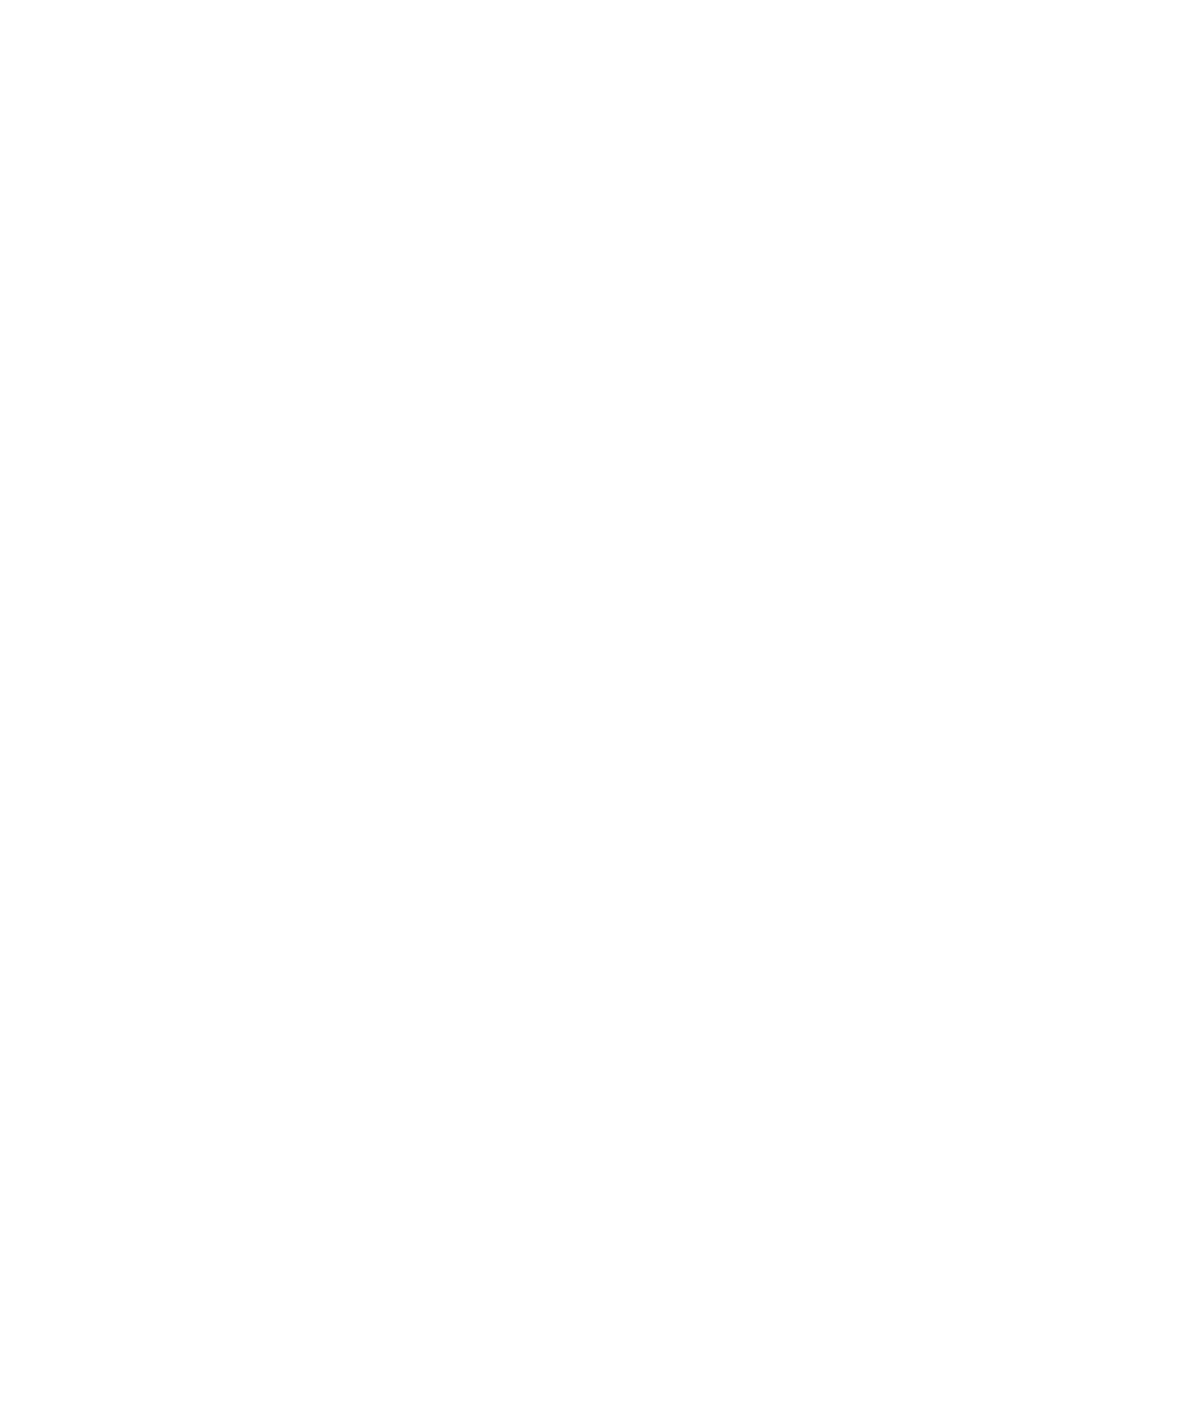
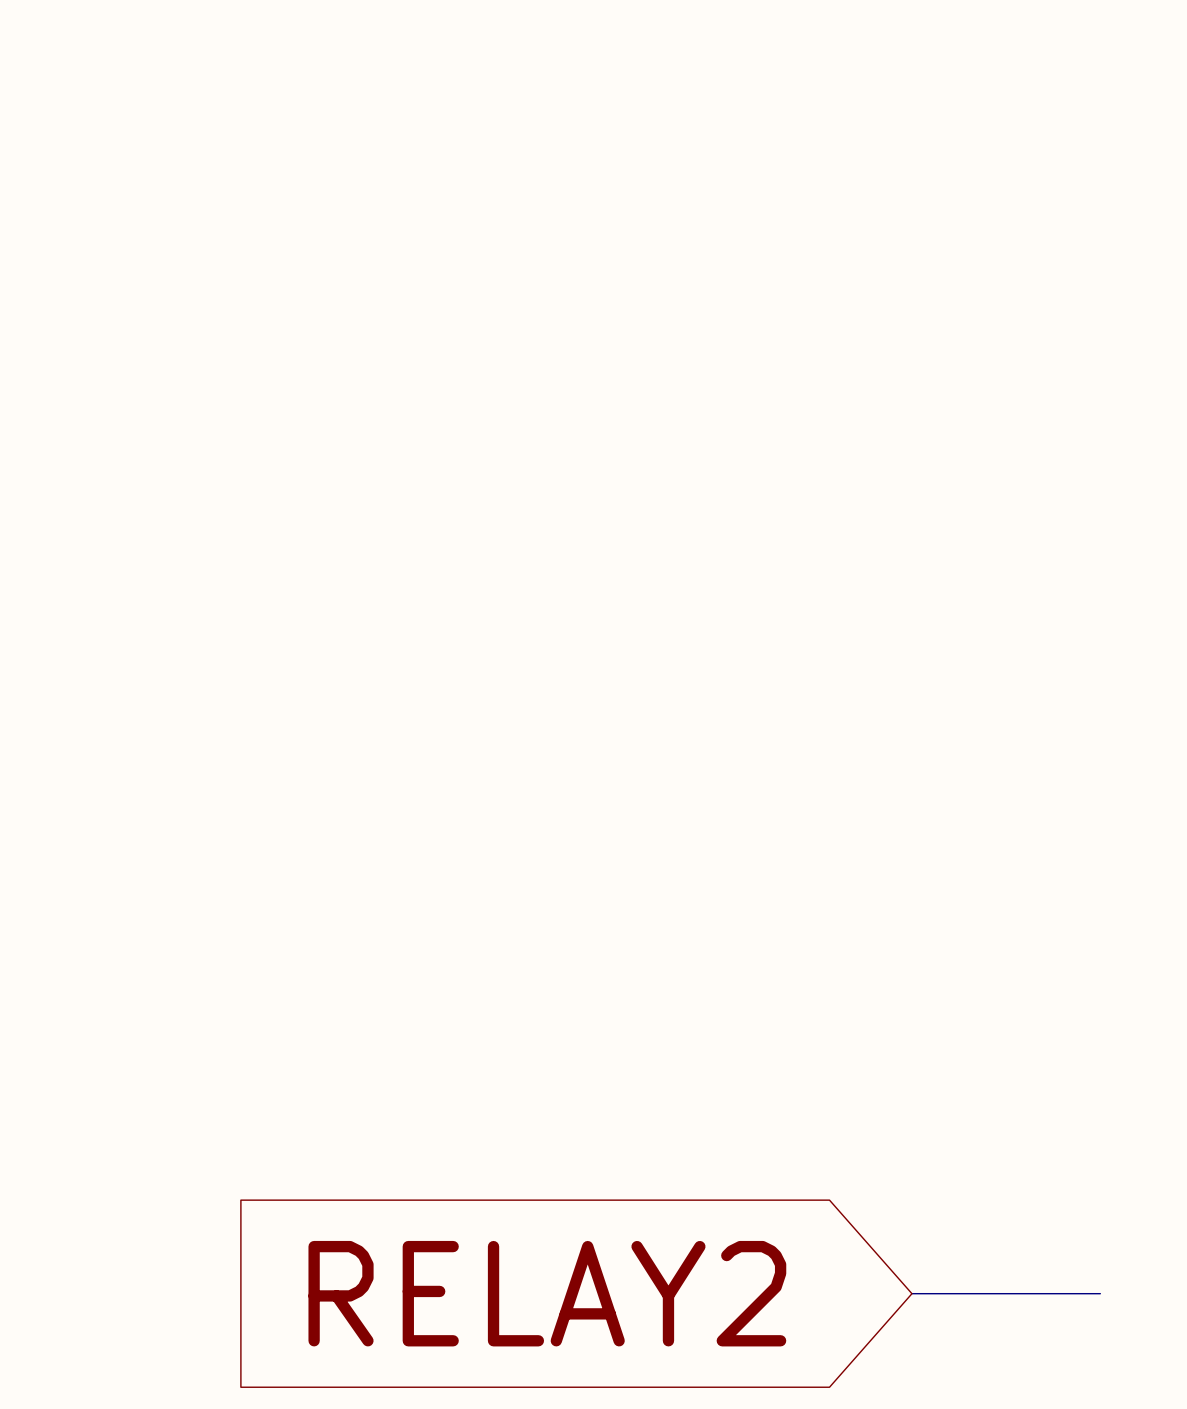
global label: none -> RELAY2 (547, 1293)
wire: none -> (911, 1293) (1100, 1293)

